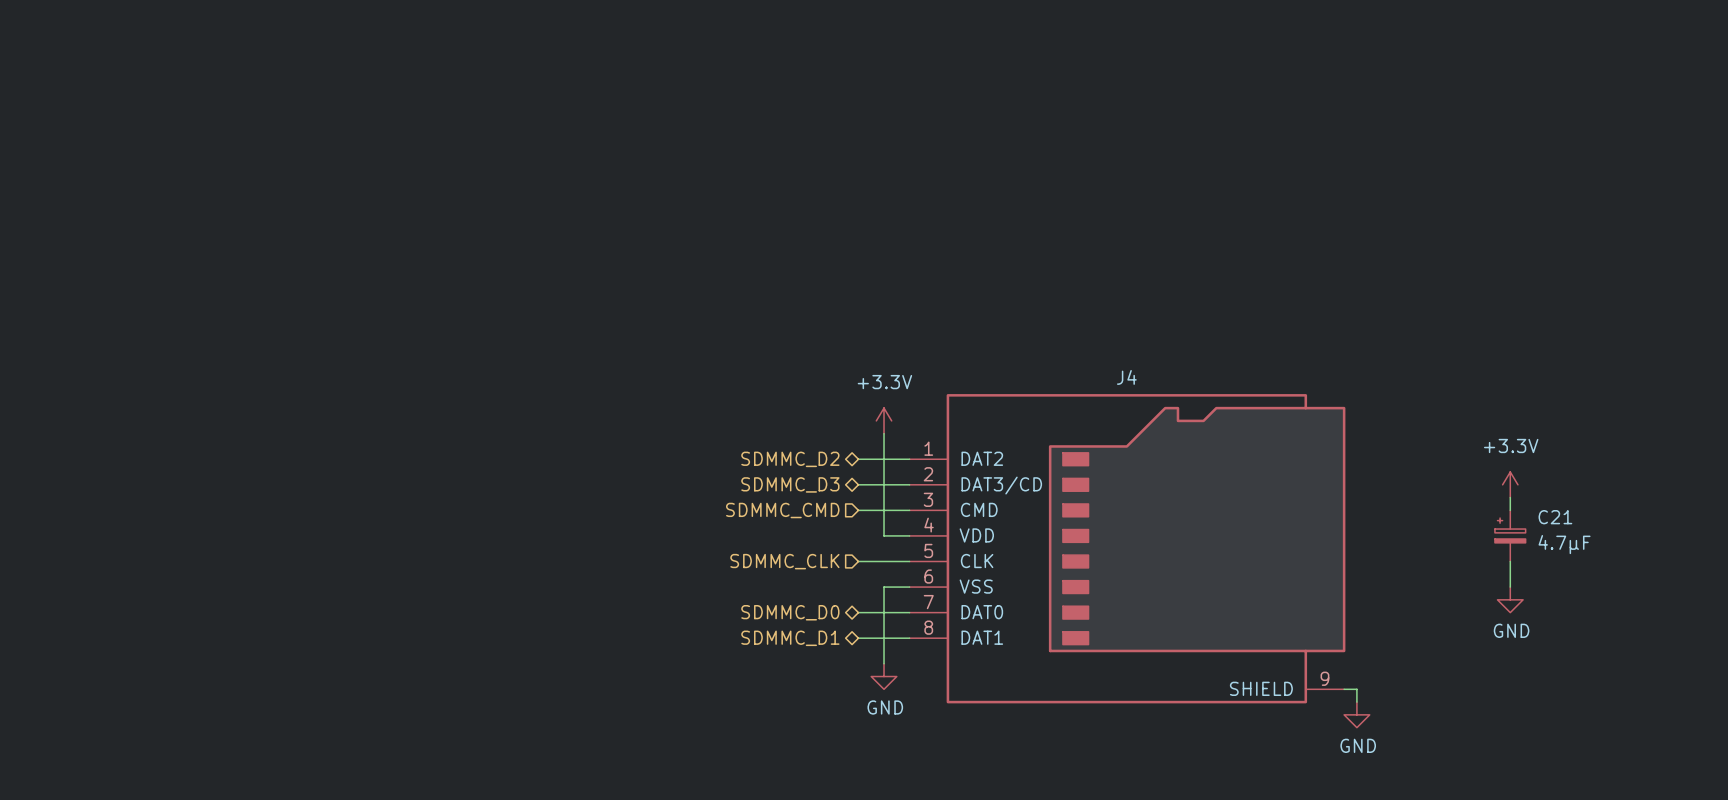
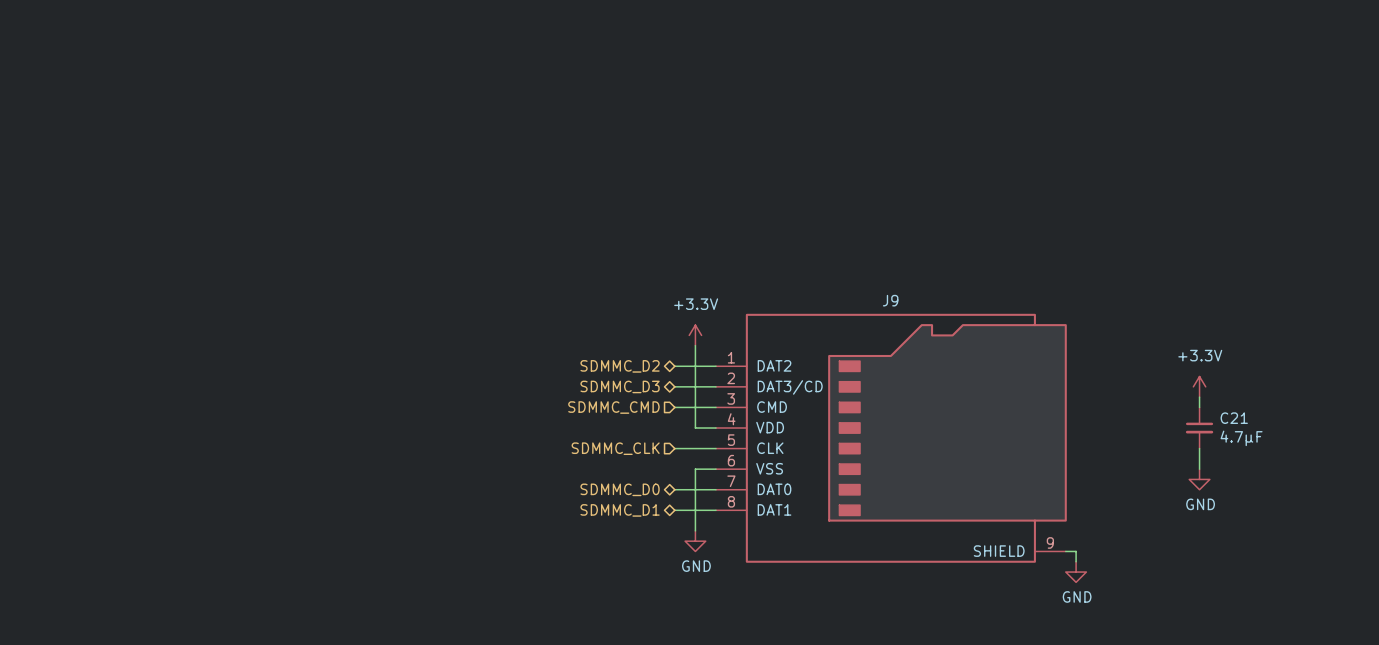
J4 name: J4 (1126, 377) -> J9 (890, 300)
C21 symbol: [1494, 510, 1526, 562] -> [1185, 407, 1214, 449]

